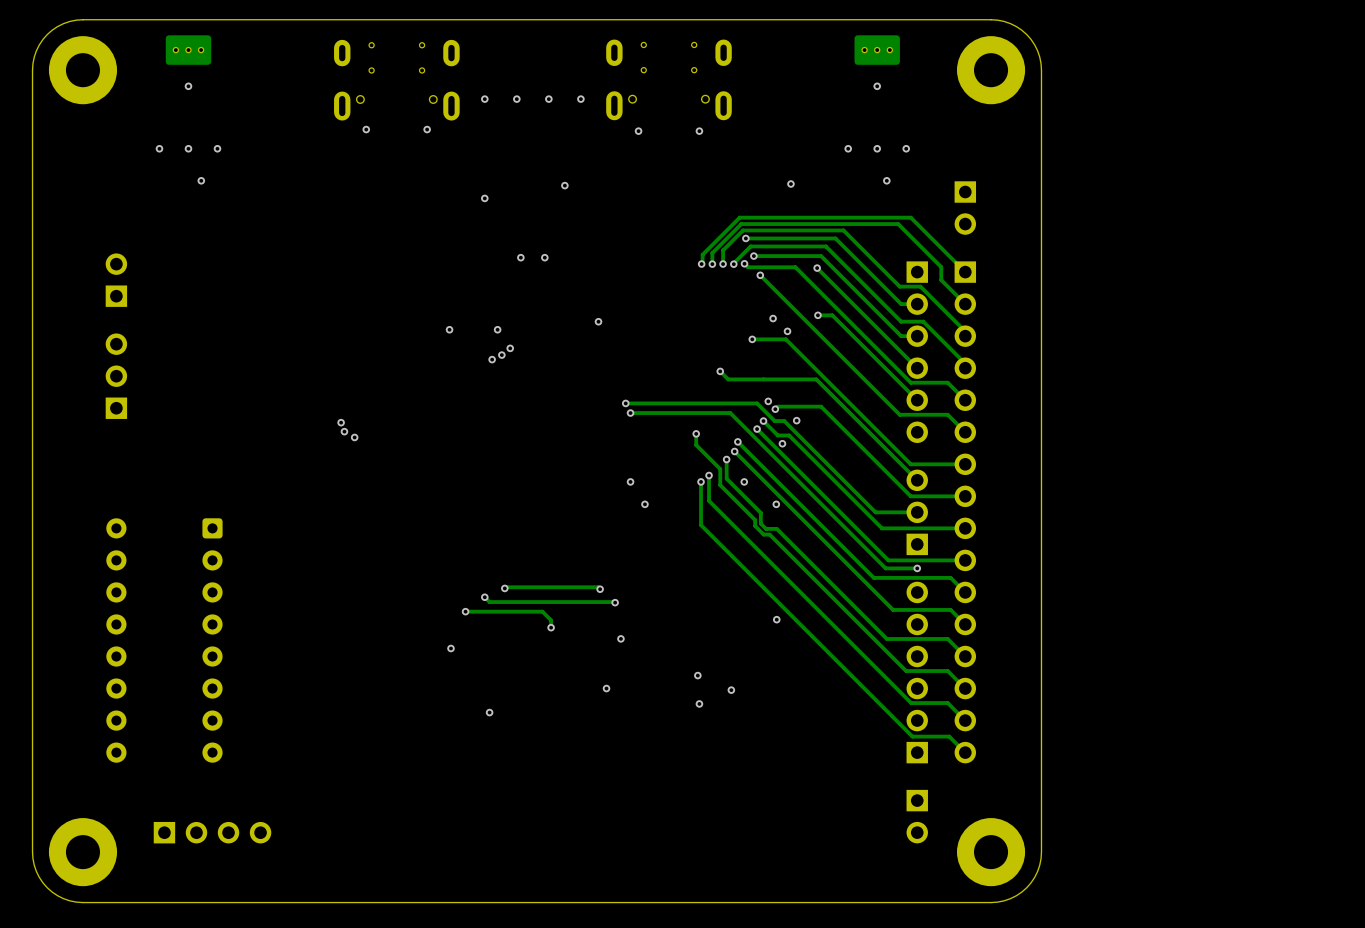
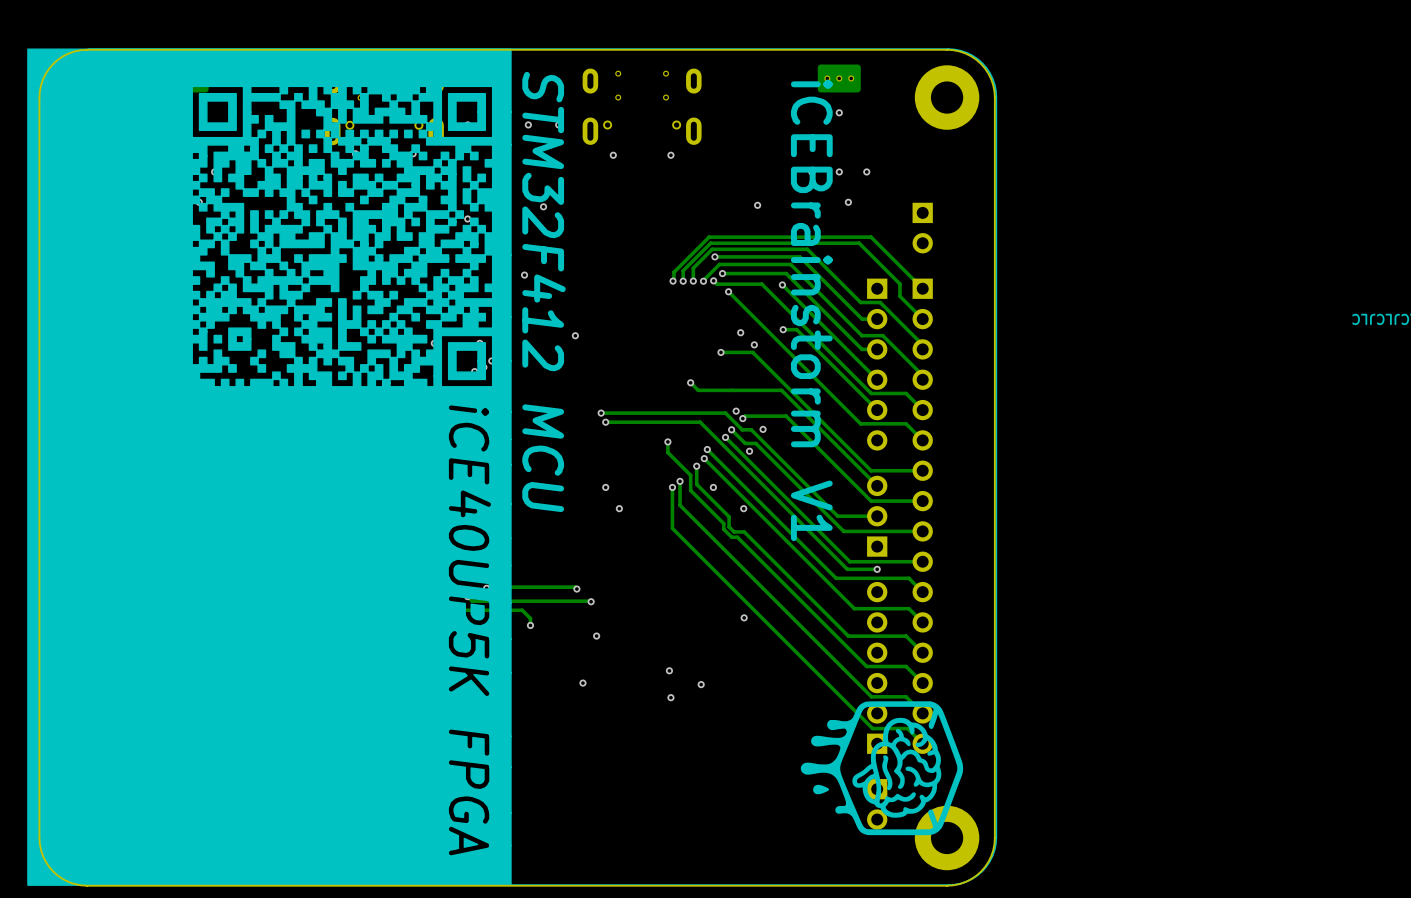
drawing: none -> [27, 48, 997, 886]

